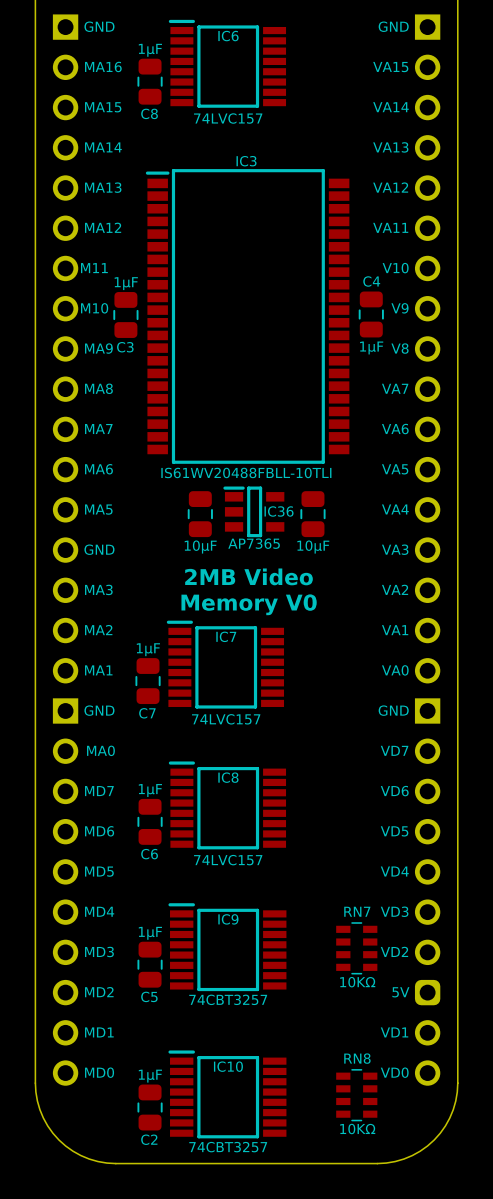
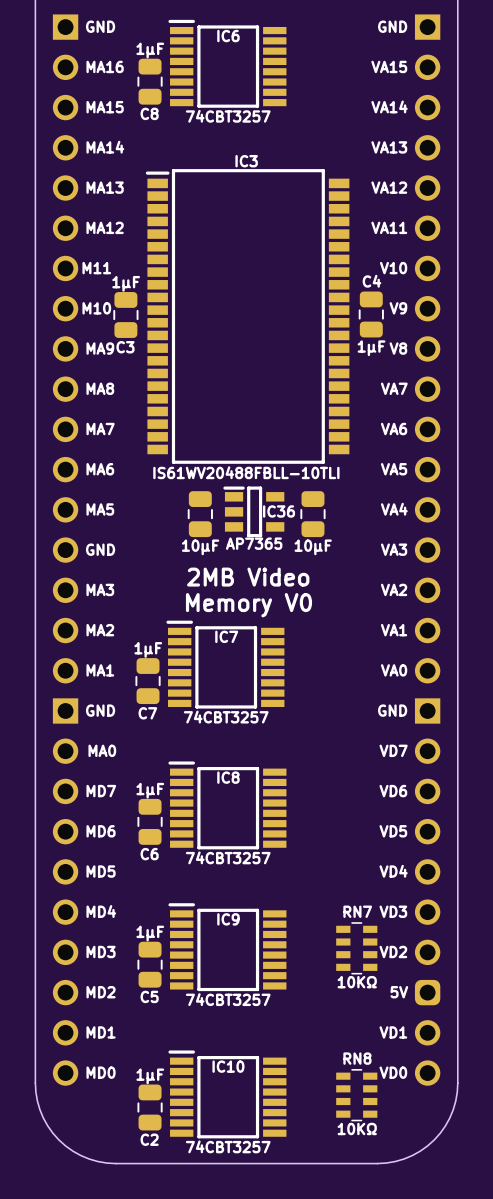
IC6 footprint: [168, 19, 287, 108] -> [168, 19, 287, 108]
IC7 footprint: [166, 620, 285, 709] -> [166, 620, 285, 709]
IC8 footprint: [168, 761, 287, 850] -> [168, 761, 287, 850]

